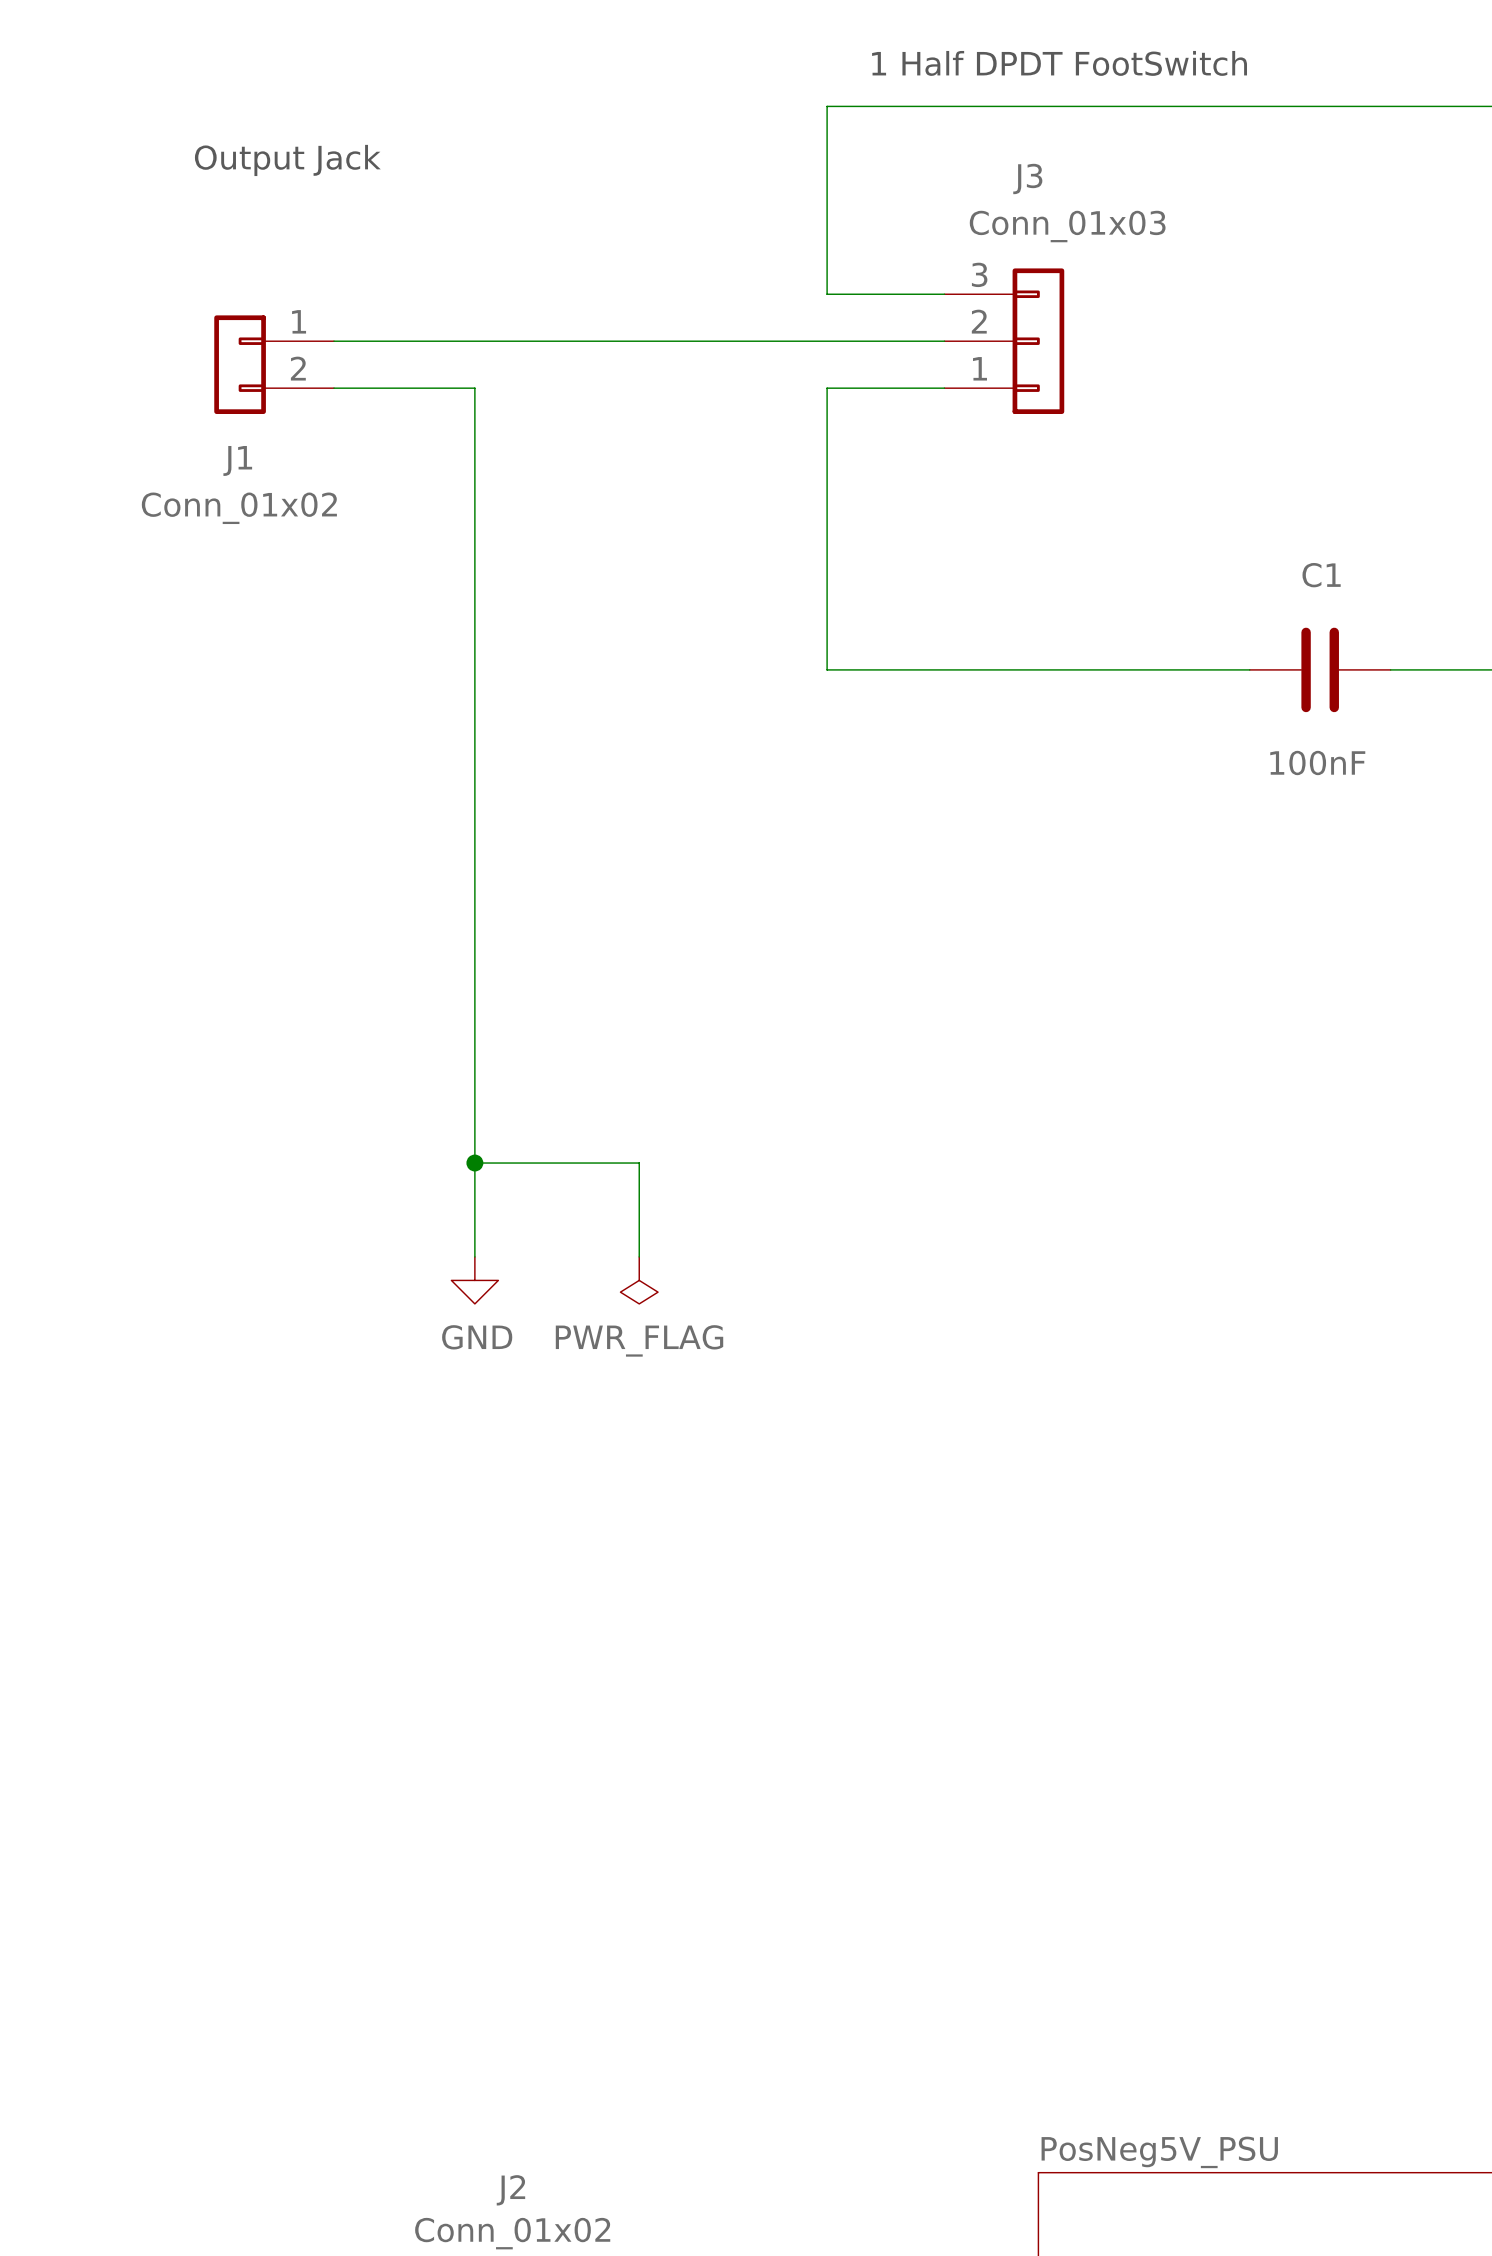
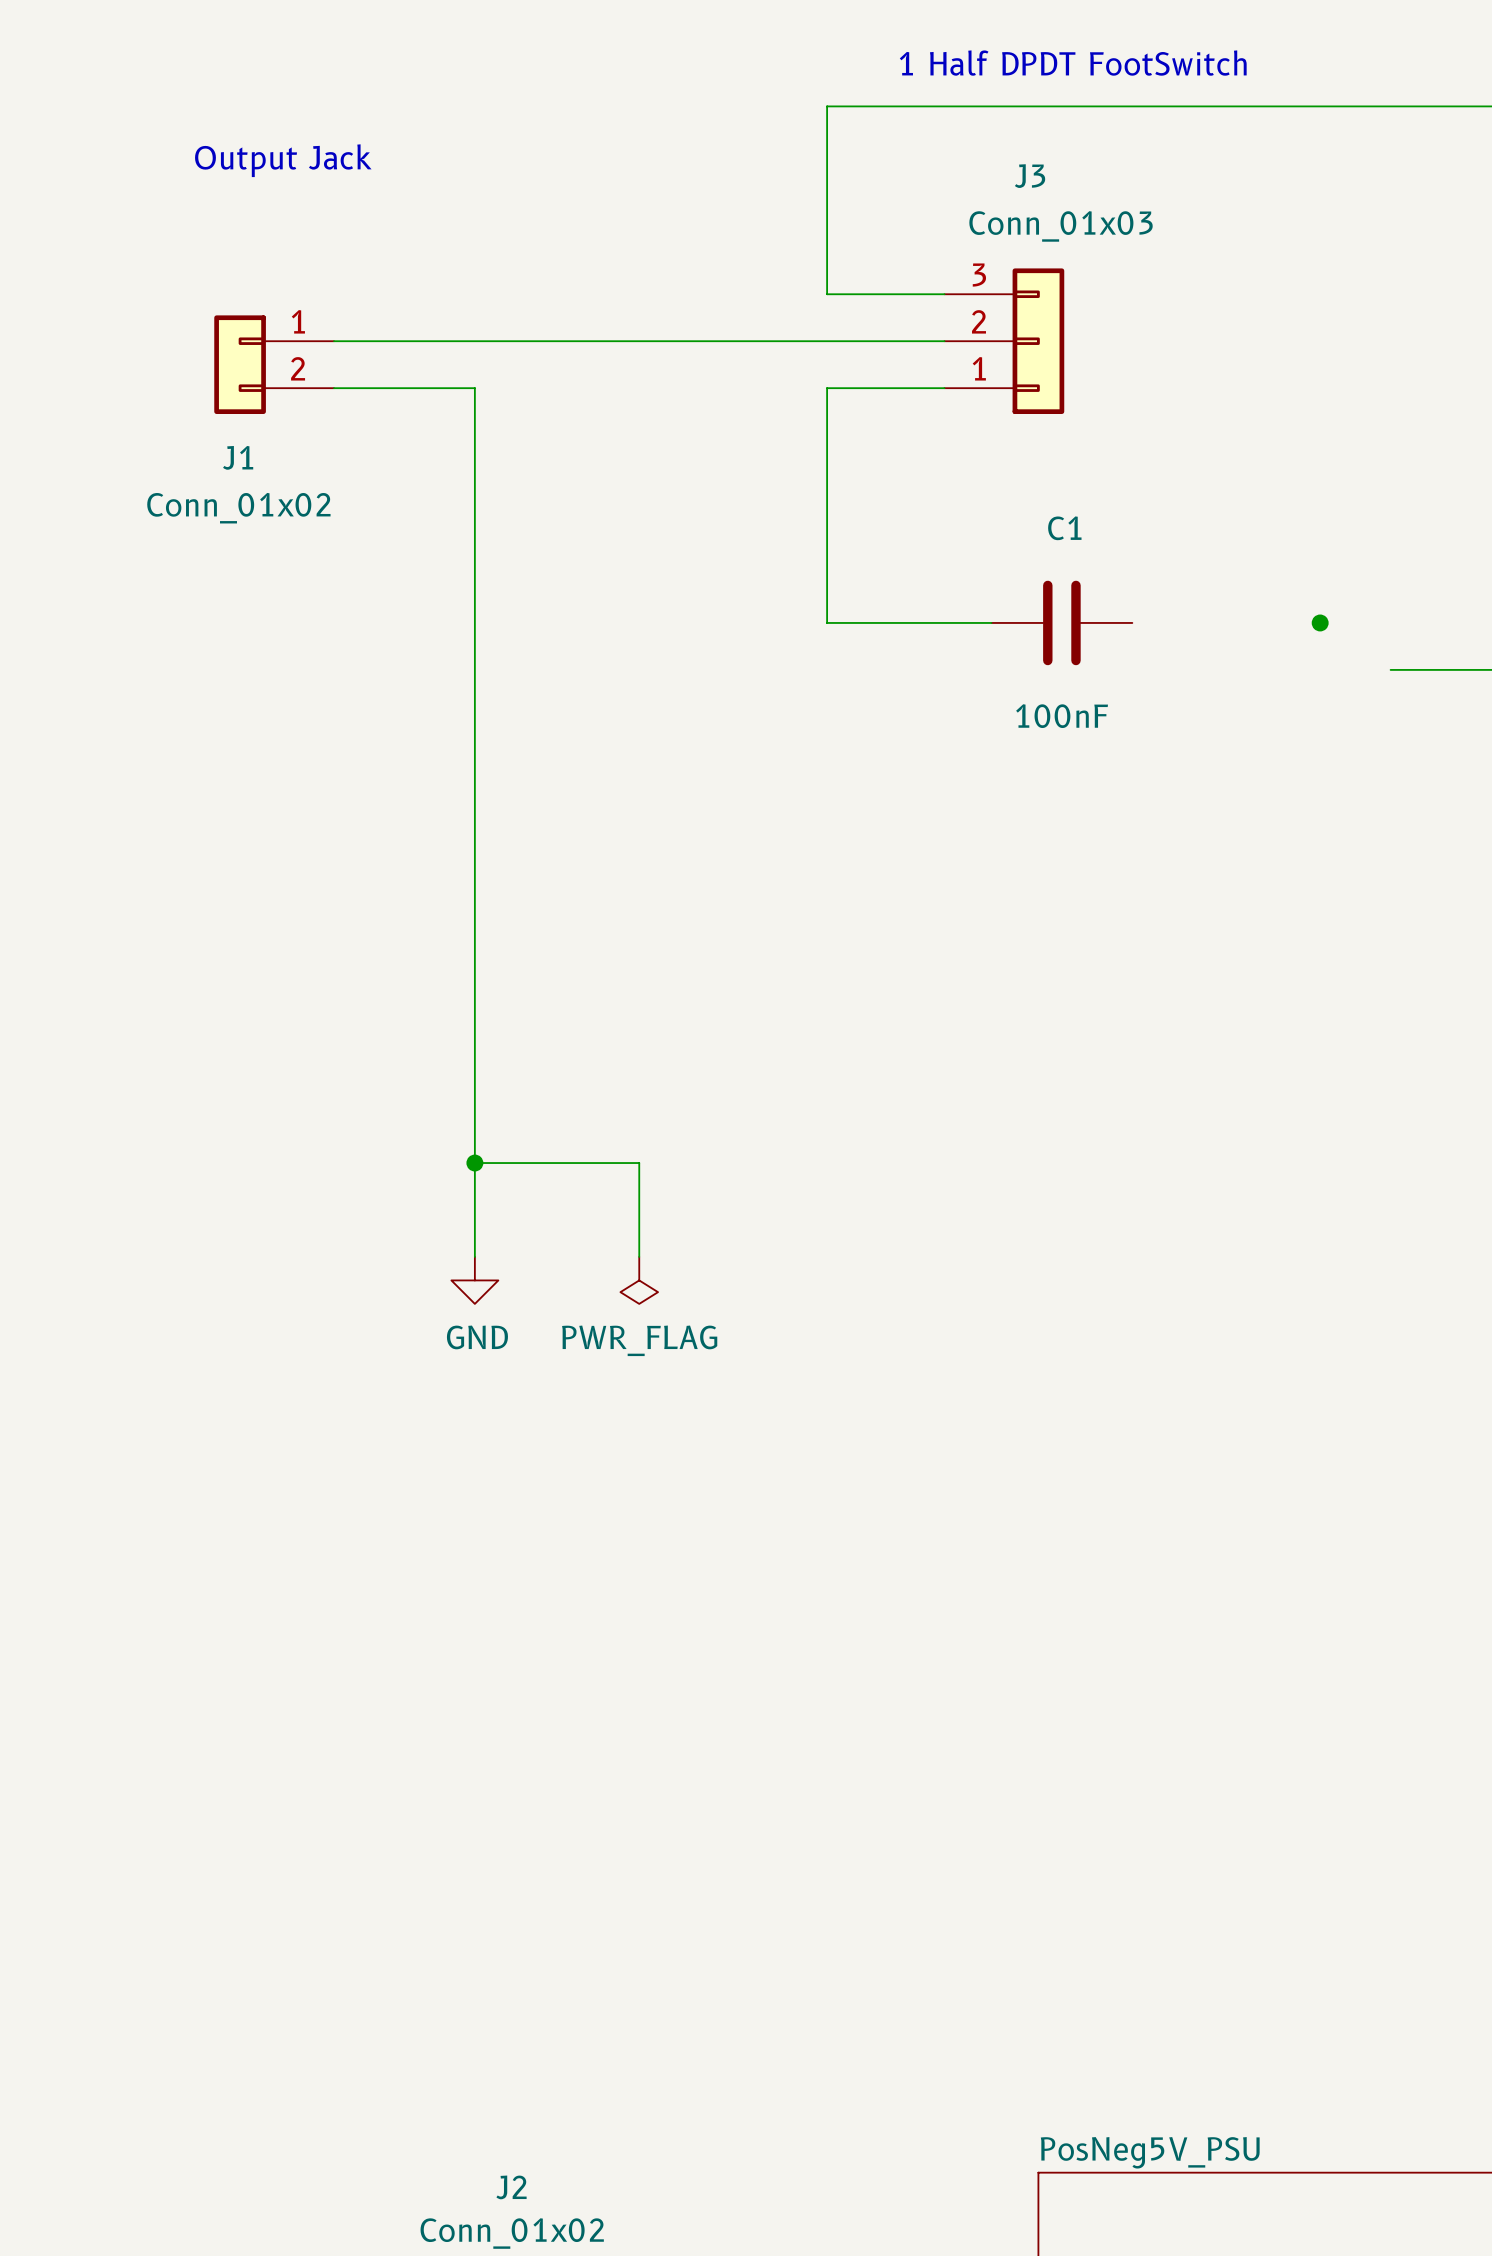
wire: (827, 622) (827, 669) (1249, 669) -> (827, 622) (991, 622)
junction: none -> (1320, 622)
C1 position: (1320, 669) -> (1061, 622)

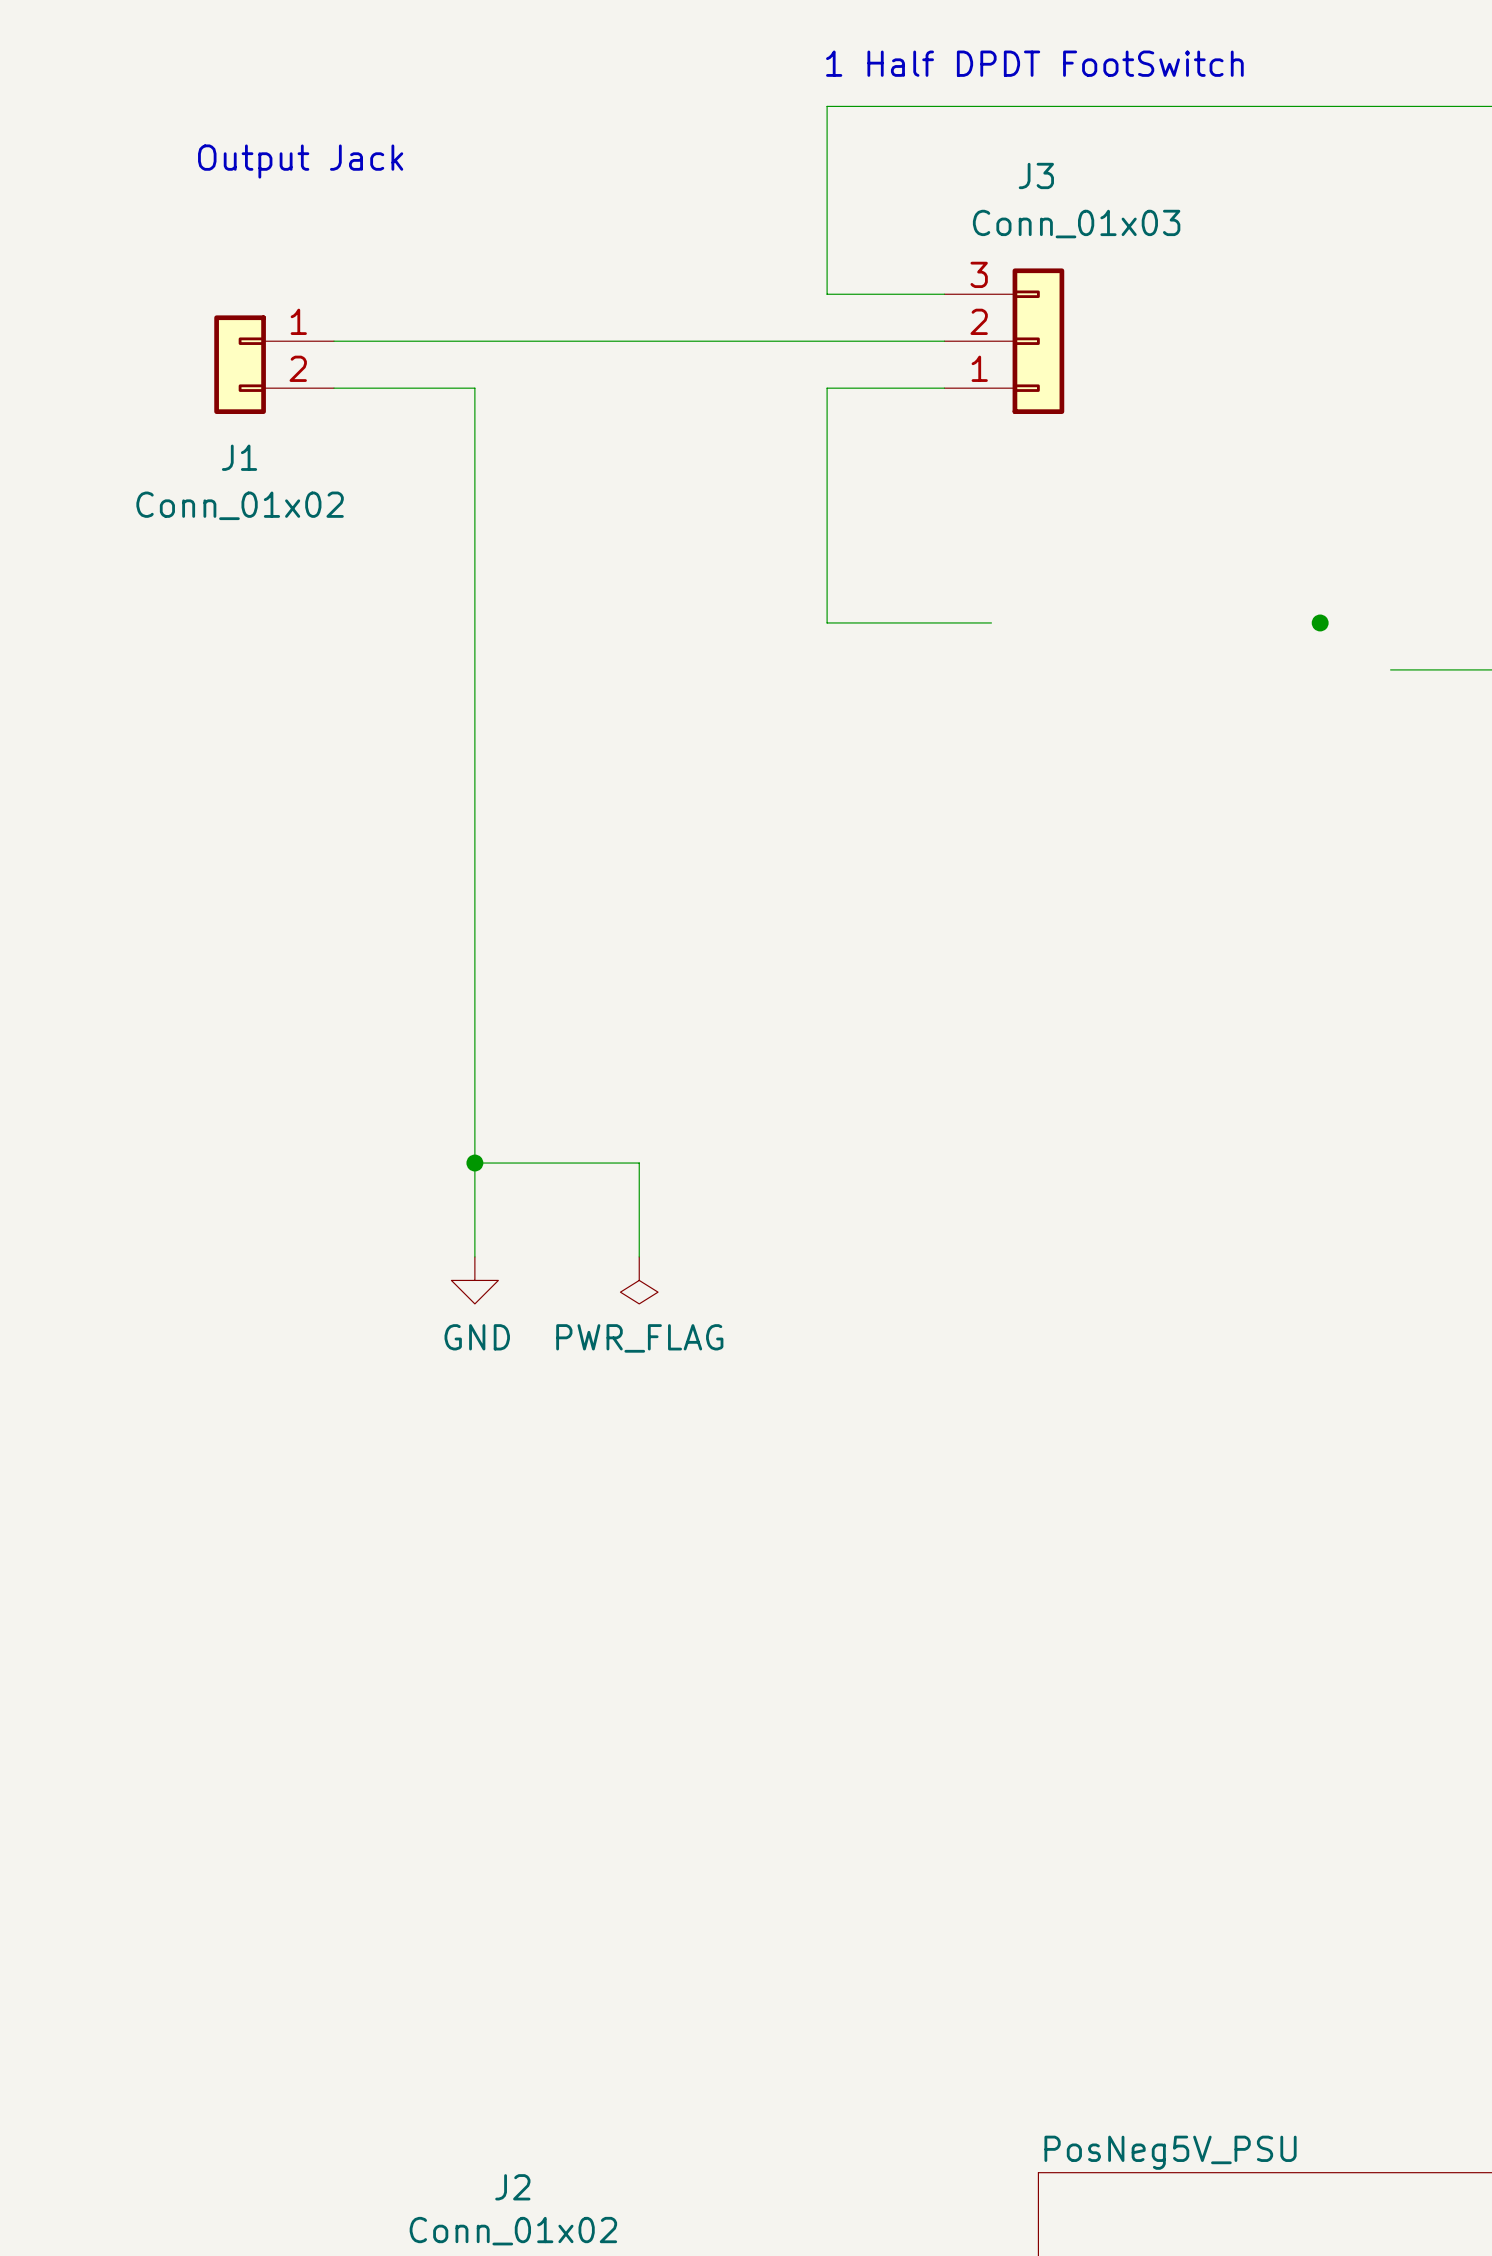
C1: 100nF (1061, 622) -> none

